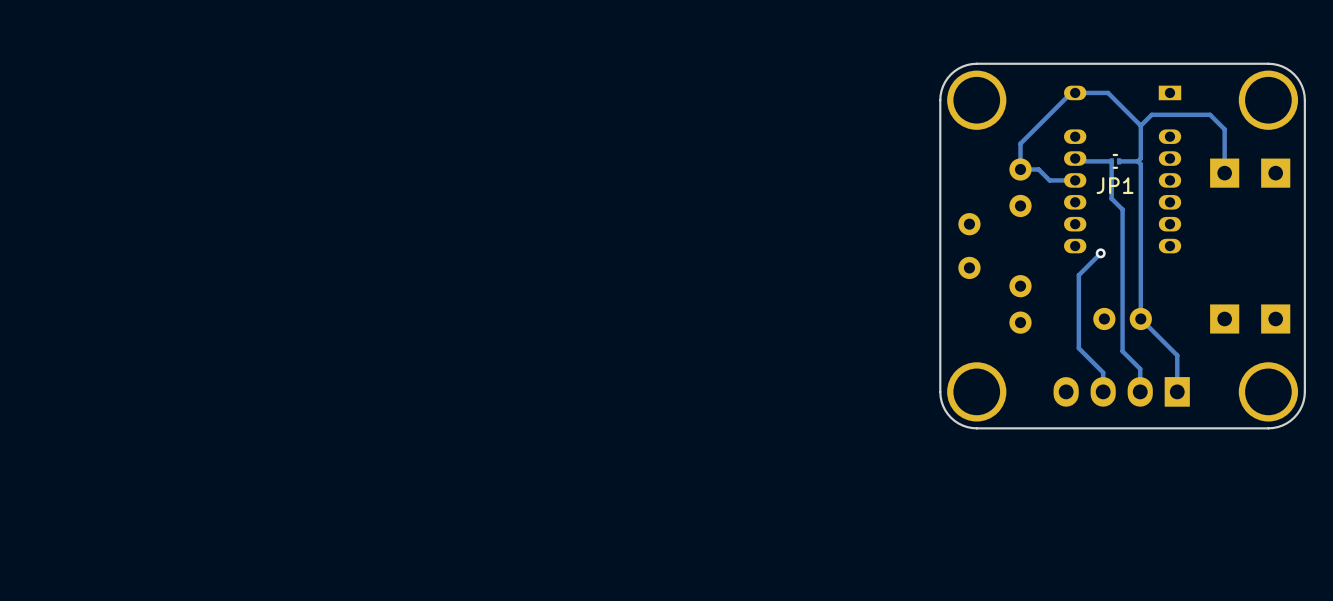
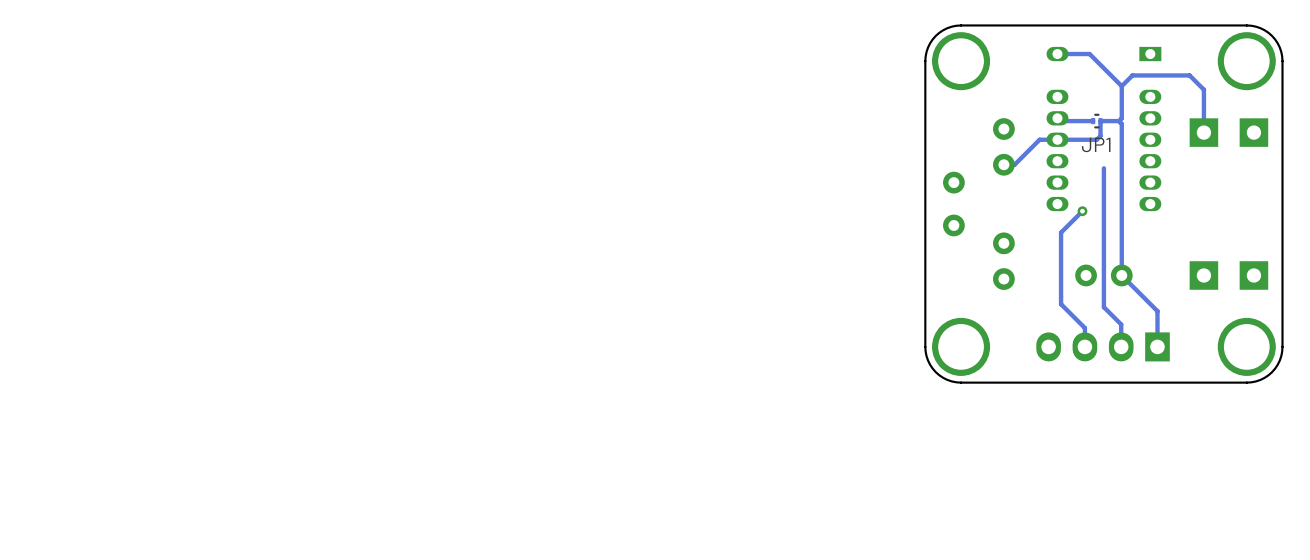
track: (1075, 92) (1071, 92) (1020, 143) (1020, 169) (1038, 169) (1049, 180) (1056, 180) -> (1003, 164) (1014, 164) (1039, 139)
track: (1111, 161) (1111, 198) (1122, 209) -> none
track: none -> (1100, 121) (1100, 136) (1096, 139) (1057, 139)

